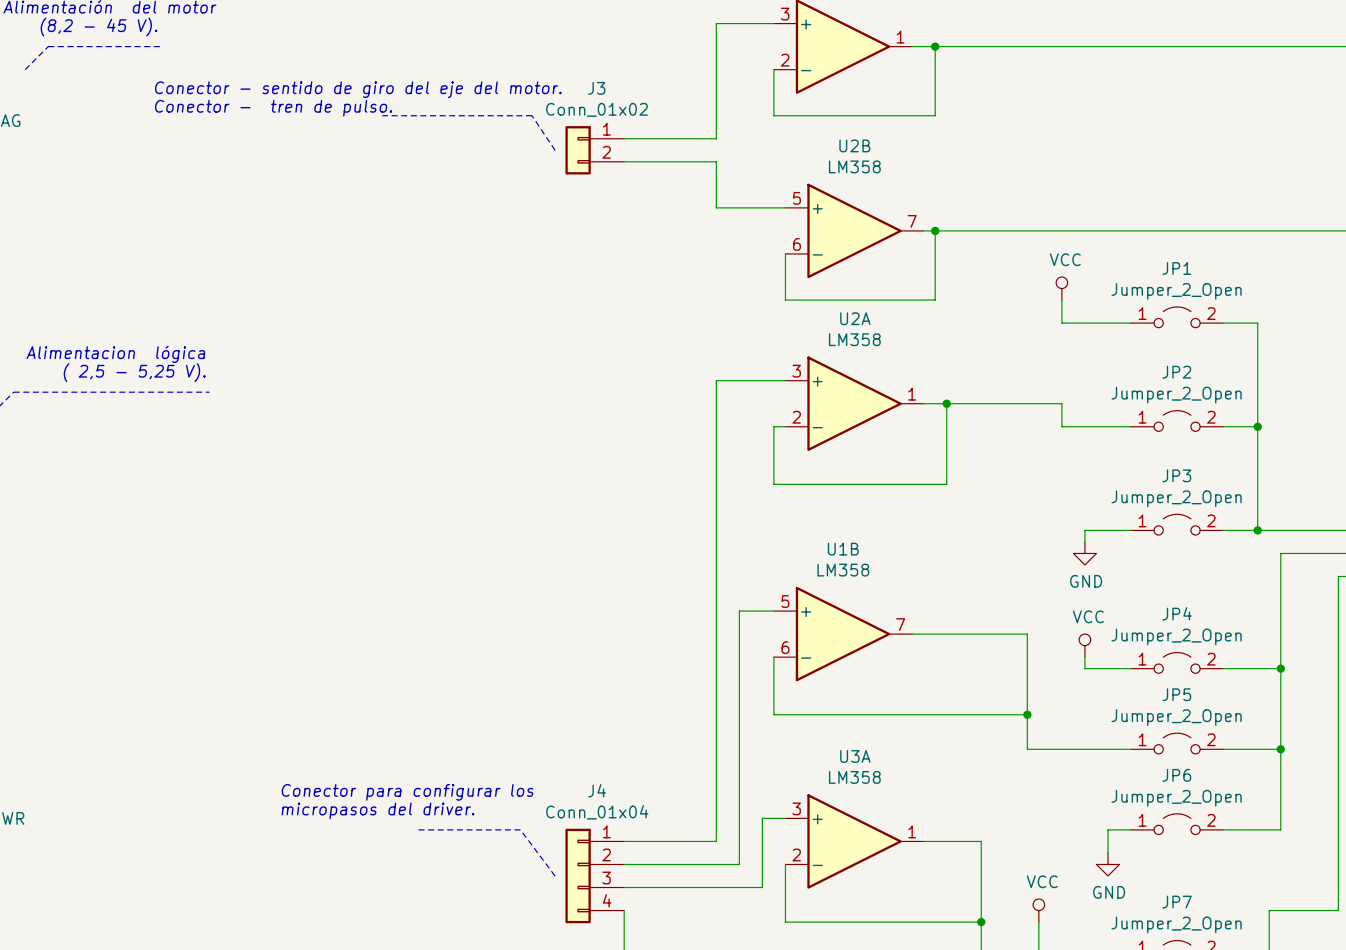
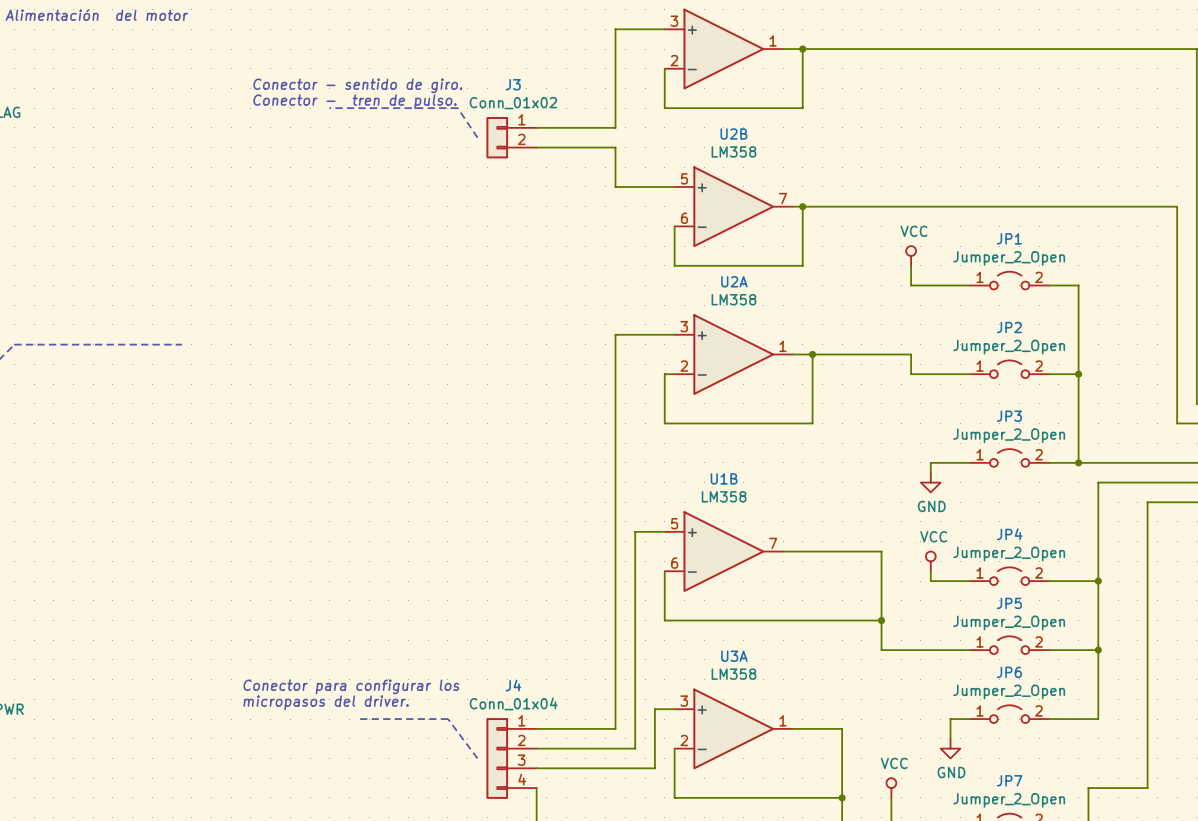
text: (8,2 - 45 V). (99, 27) -> none
line: (163, 46) (48, 46) (25, 69) -> none
text: Conector - sentido de giro del eje del motor. (358, 89) -> Conector - sentido de giro. (357, 85)
text position: Conector - tren de pulso. (273, 108) -> Conector - tren de pulso. (354, 101)
text: Alimentacion lógica (115, 354) -> none
text: ( 2,5 - 5,25 V). (134, 372) -> none

